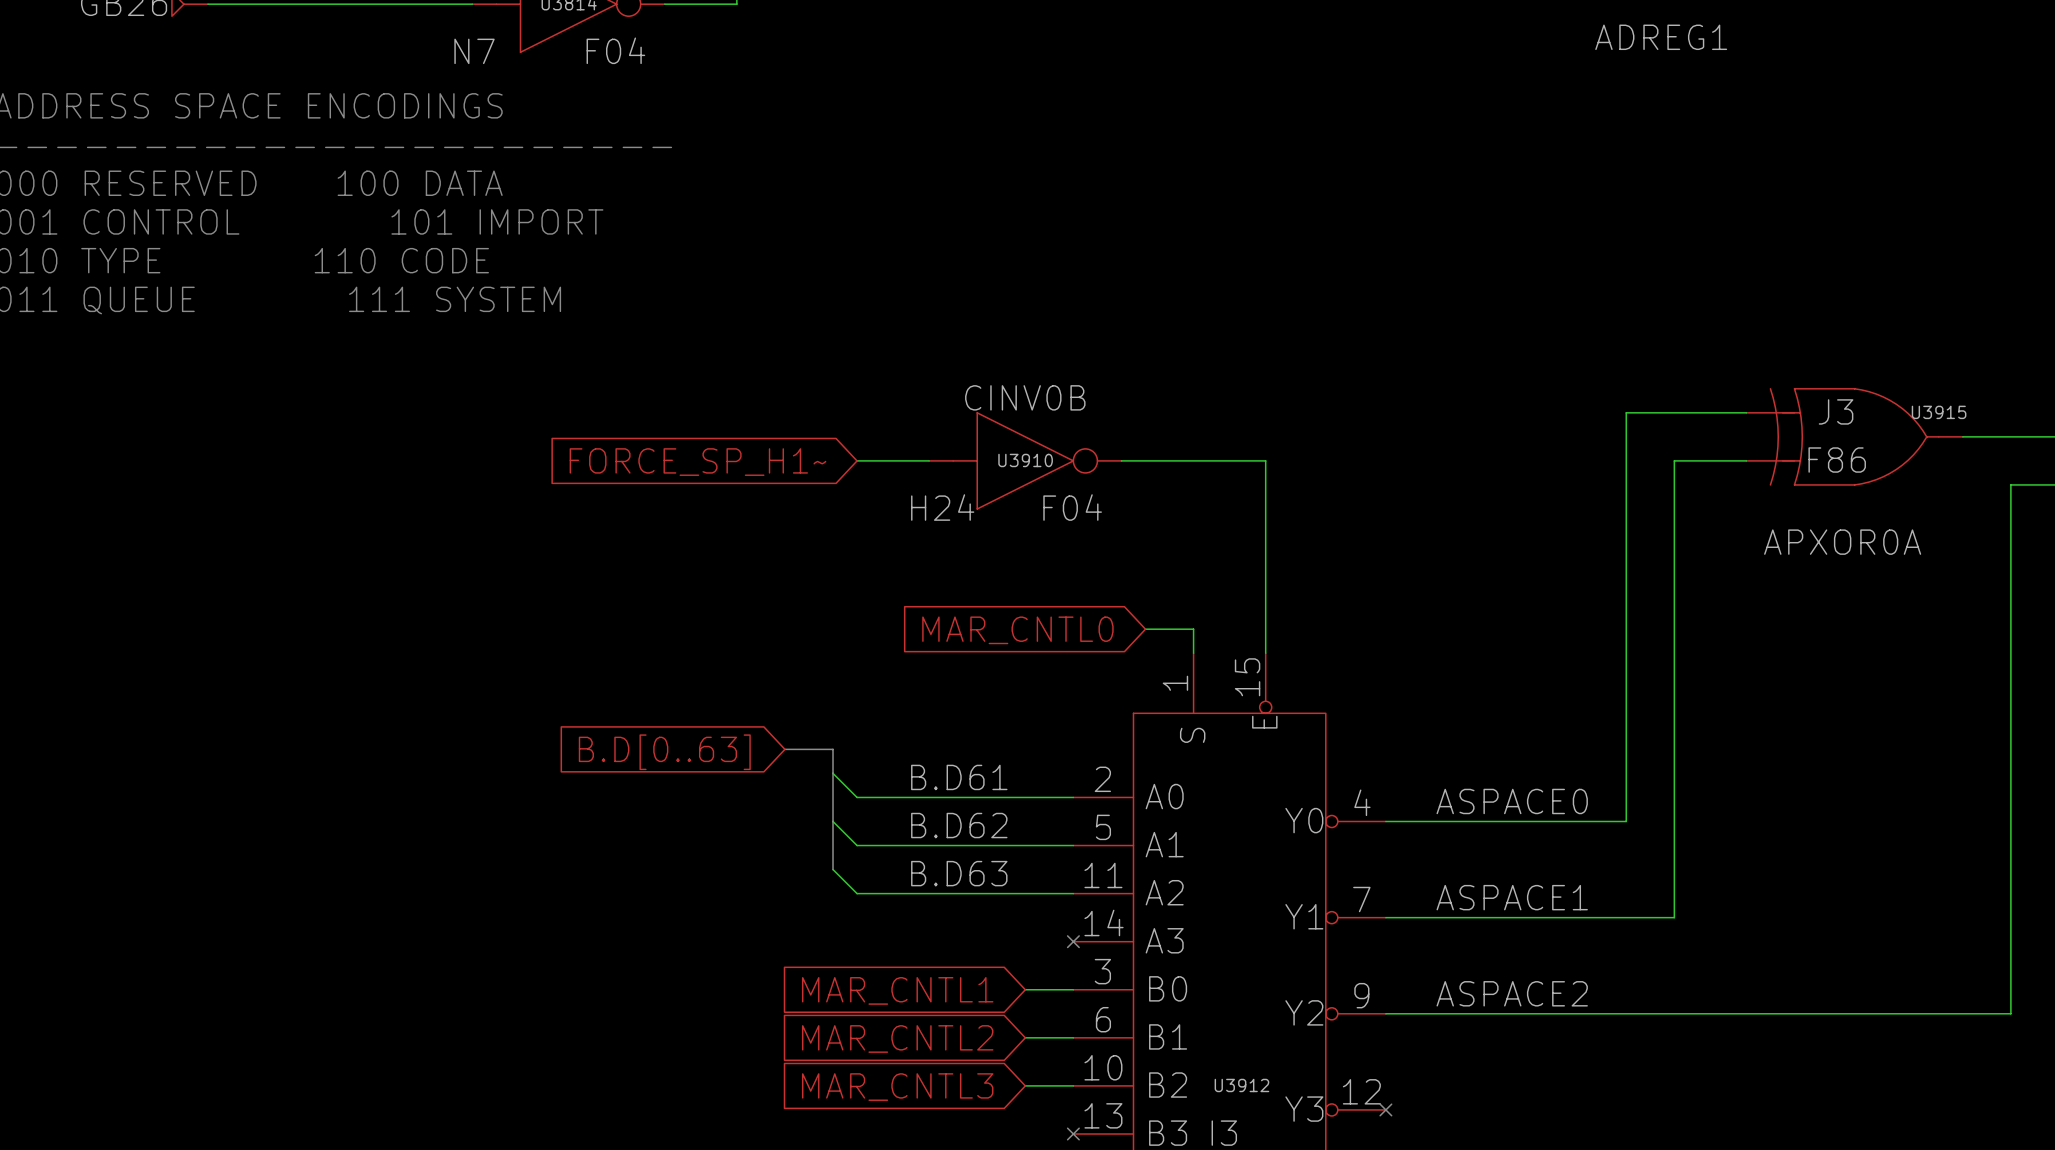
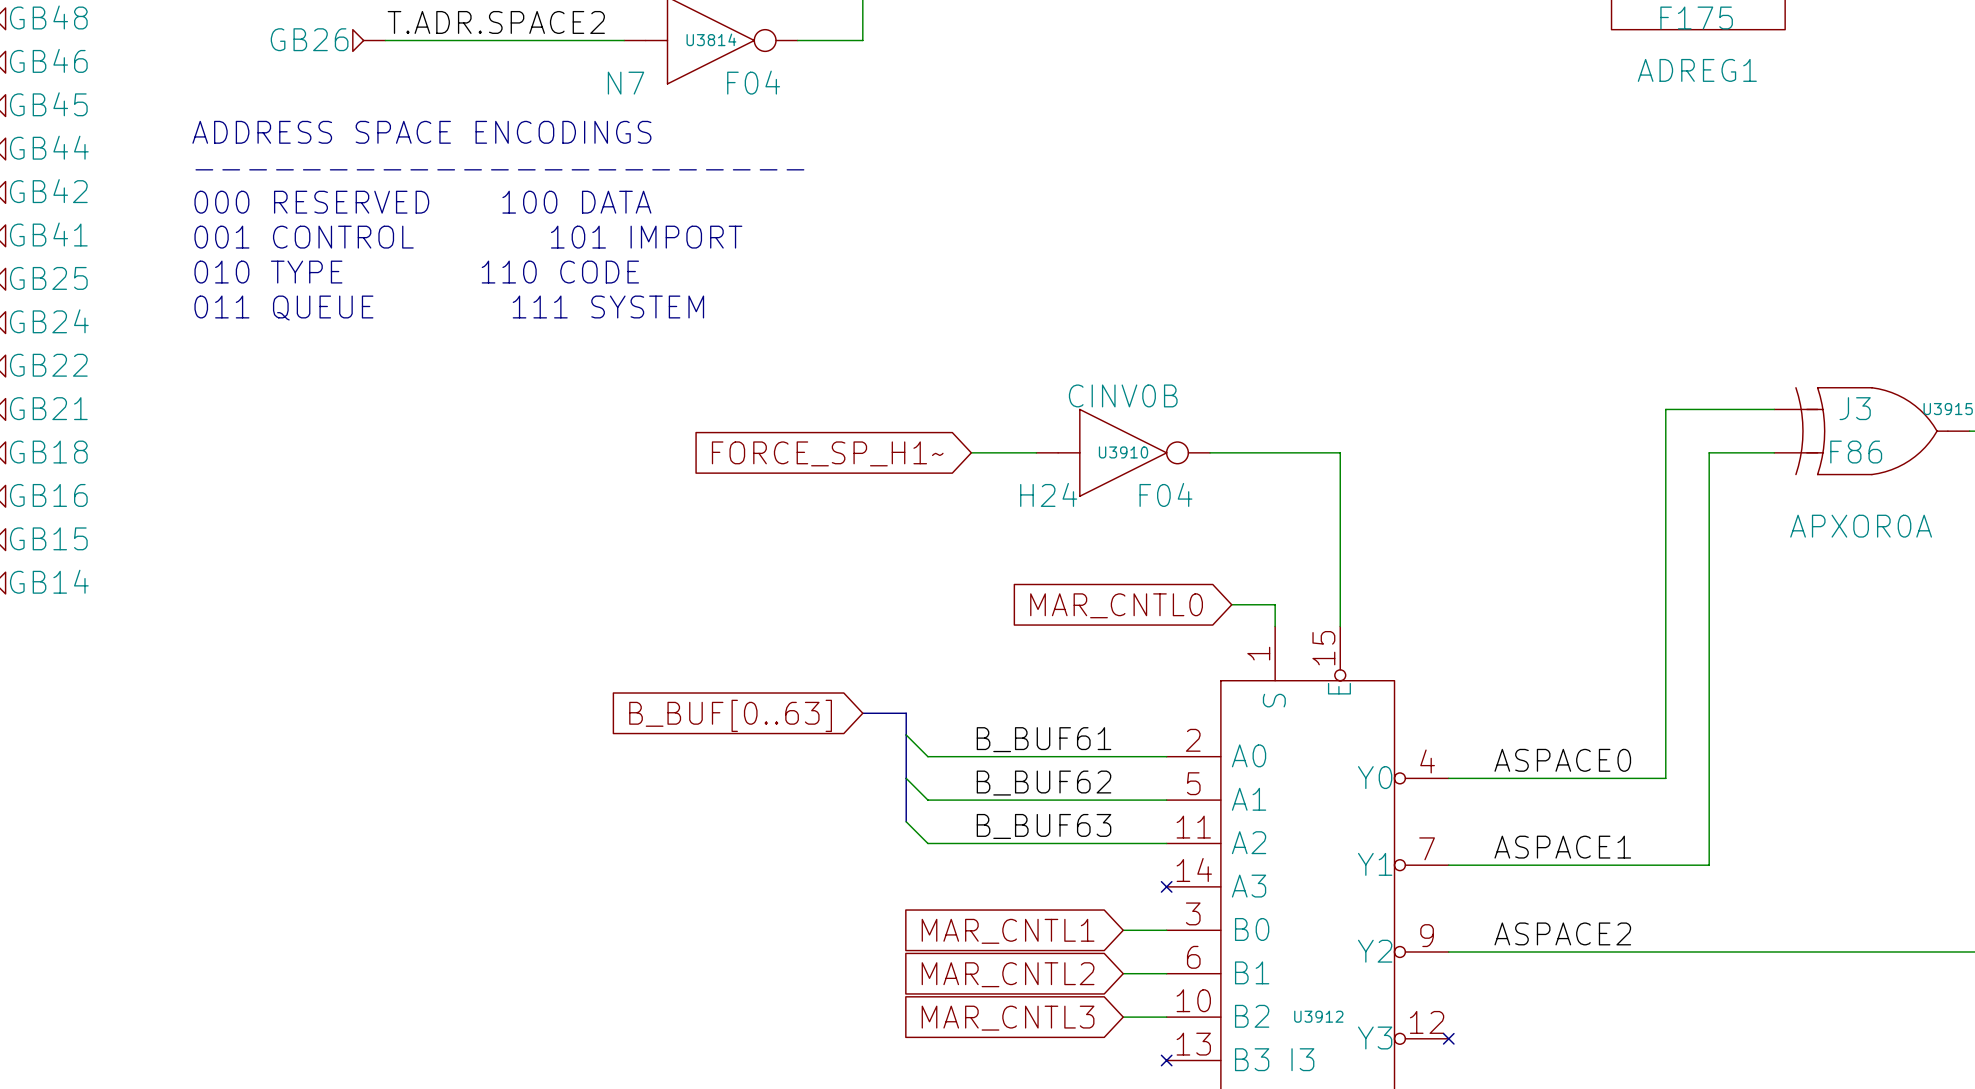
bus: (784, 749) (833, 749) (833, 869) -> (862, 713) (906, 713) (906, 821)
global label: B.D[0..63] (664, 752) -> B_BUF[0..63] (730, 715)
wire: (833, 773) (857, 797) -> (906, 734) (927, 756) (971, 756)
label: B.D61 (959, 777) -> none
label: none -> B_BUF61 (1044, 739)
wire: (833, 821) (857, 845) -> (906, 778) (927, 800) (971, 800)
label: B.D62 (959, 825) -> none
label: none -> B_BUF62 (1044, 783)
wire: (833, 869) (857, 893) -> (906, 821) (927, 843) (971, 843)
label: B.D63 (959, 873) -> none
label: none -> B_BUF63 (1044, 826)

